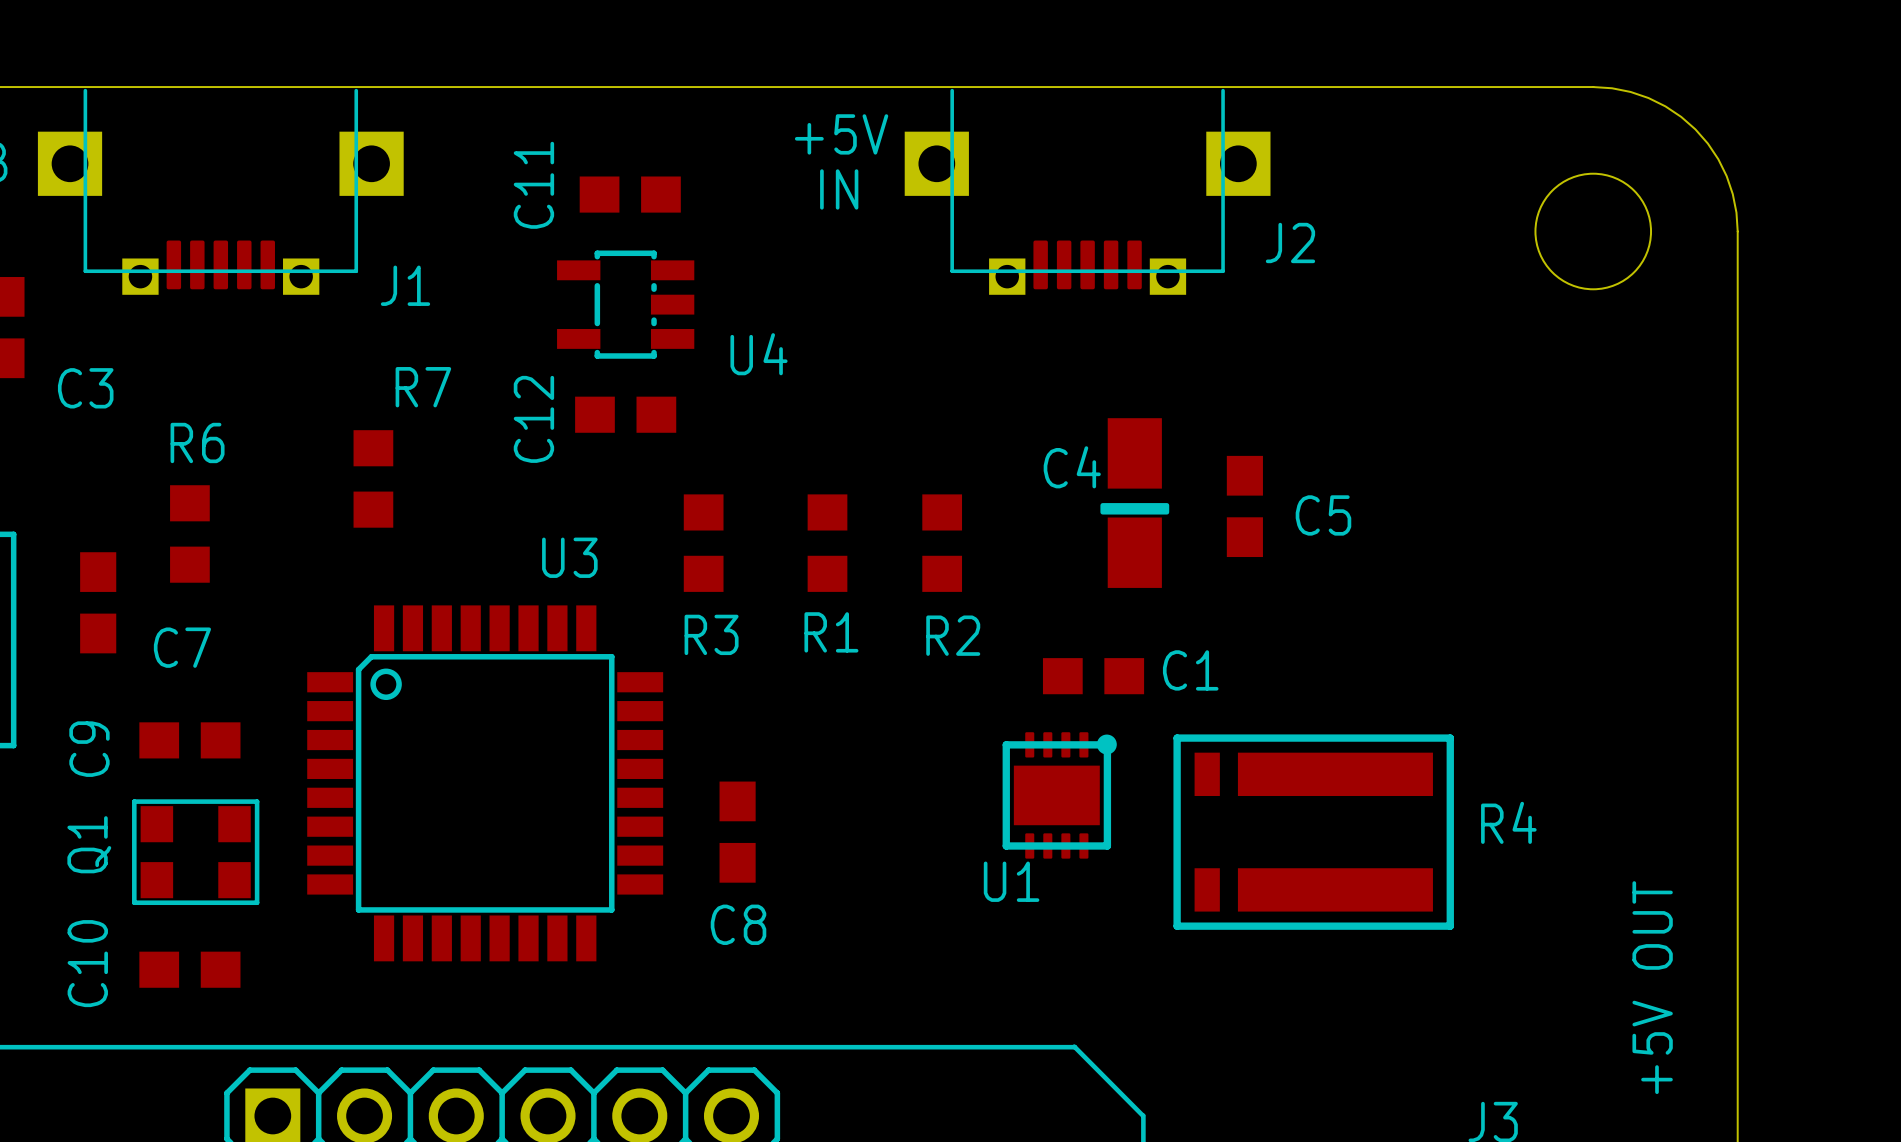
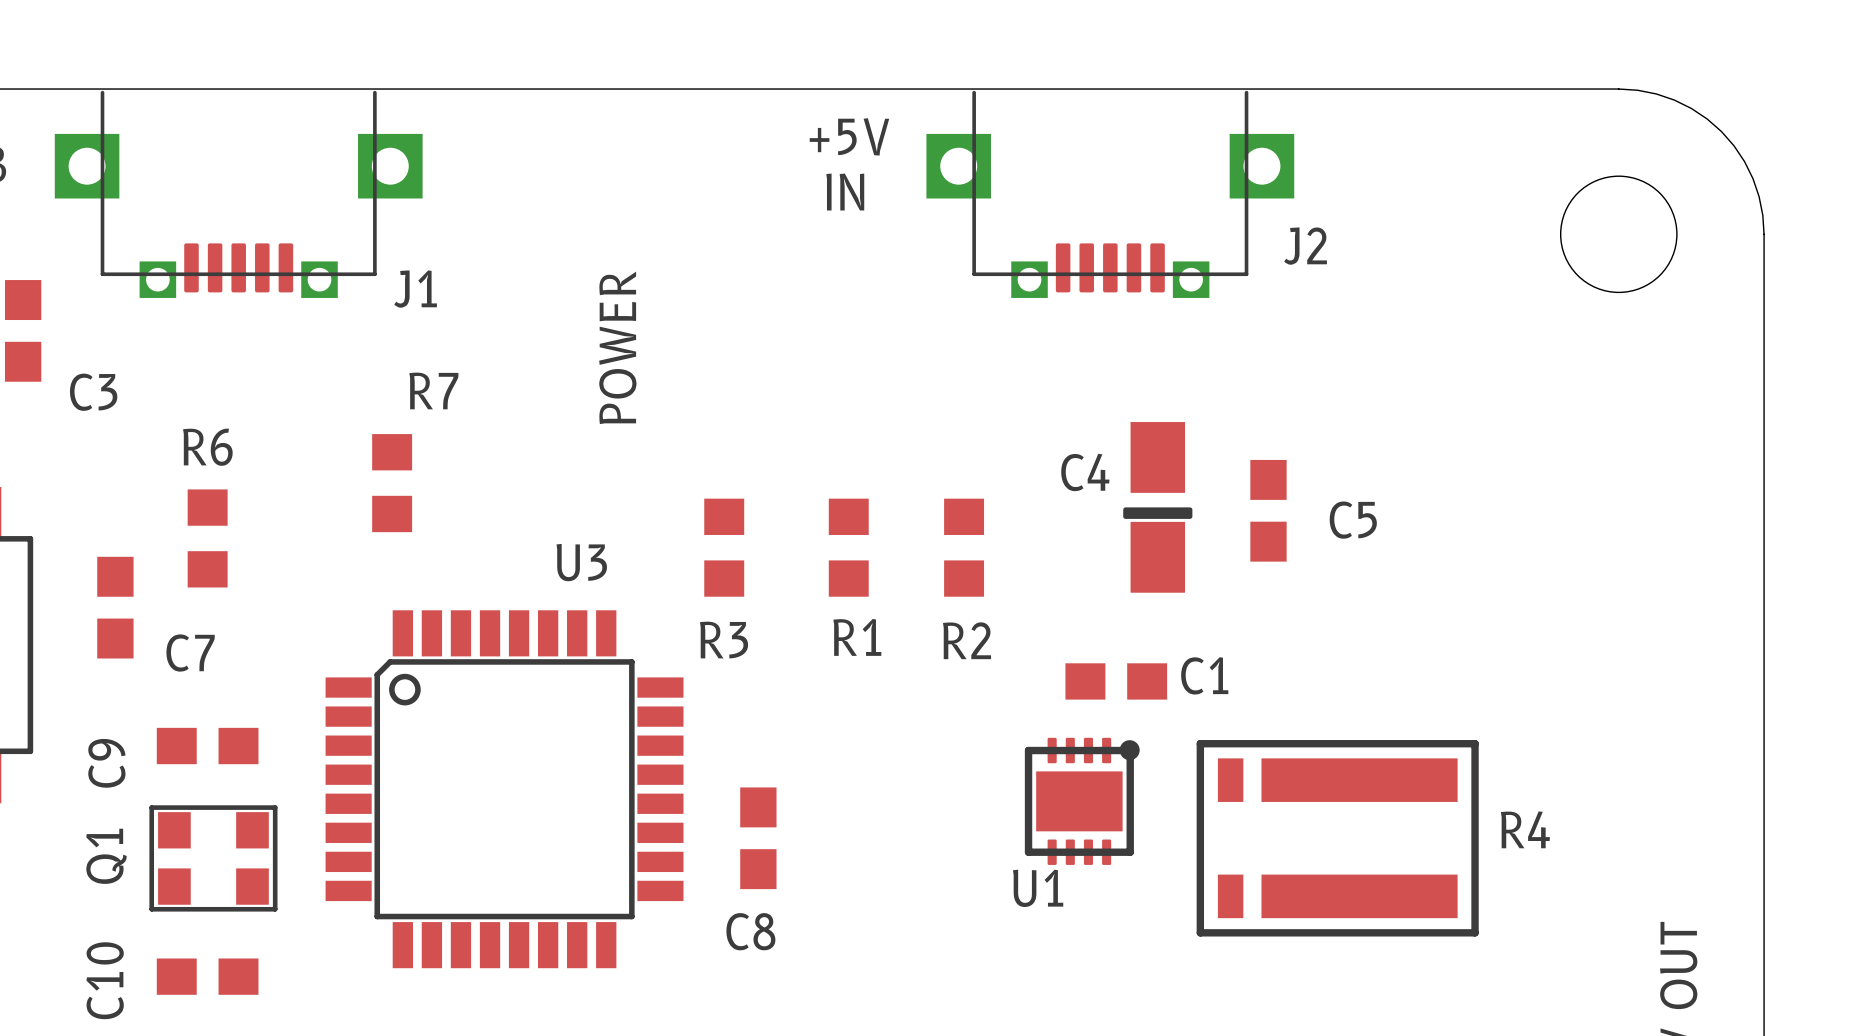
C11: (630, 194) -> none
U4: (625, 304) -> none
text: none -> POWER (617, 347)
C12: (625, 414) -> none

